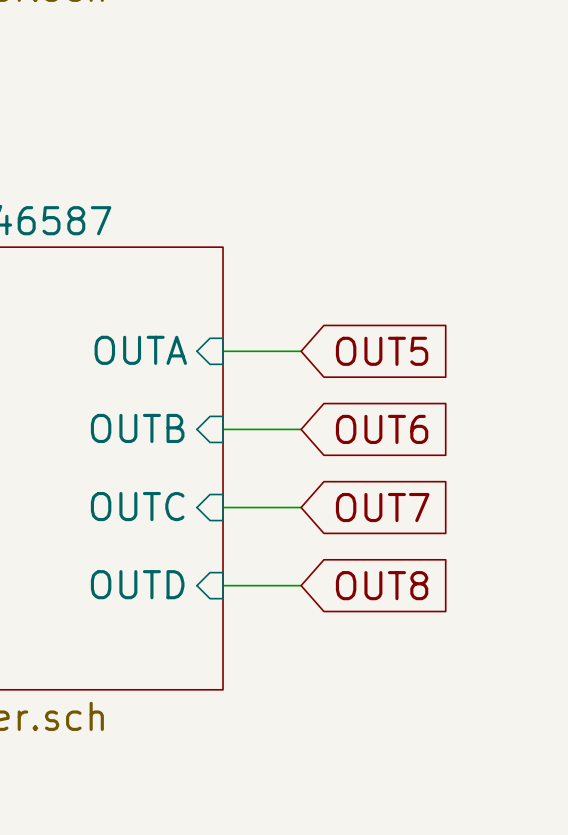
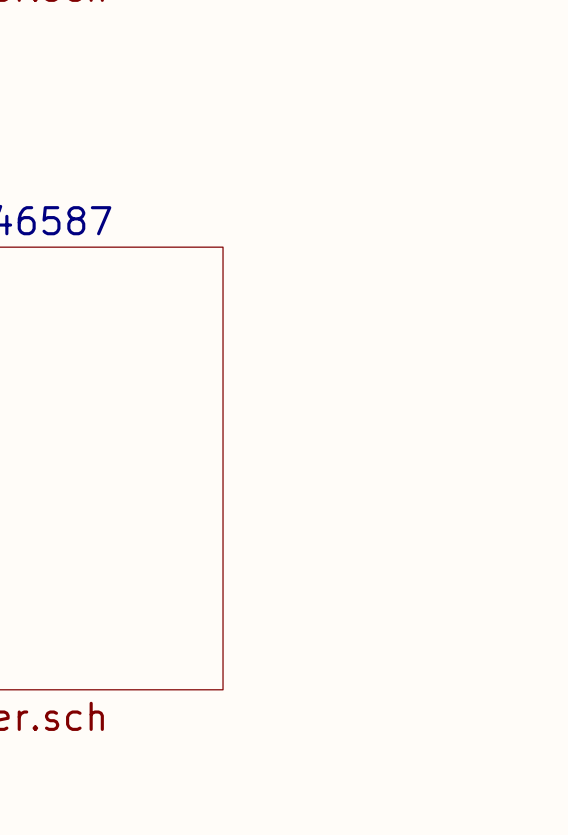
sheet pin: OUTA (140, 350) -> none
wire: (223, 351) (301, 351) -> none
global label: OUT5 (382, 351) -> none
sheet pin: OUTB (137, 428) -> none
wire: (223, 429) (301, 429) -> none
global label: OUT6 (382, 429) -> none
sheet pin: OUTC (137, 506) -> none
wire: (223, 507) (301, 507) -> none
global label: OUT7 (382, 507) -> none
sheet pin: OUTD (137, 584) -> none
wire: (223, 585) (301, 585) -> none
global label: OUT8 (382, 585) -> none

